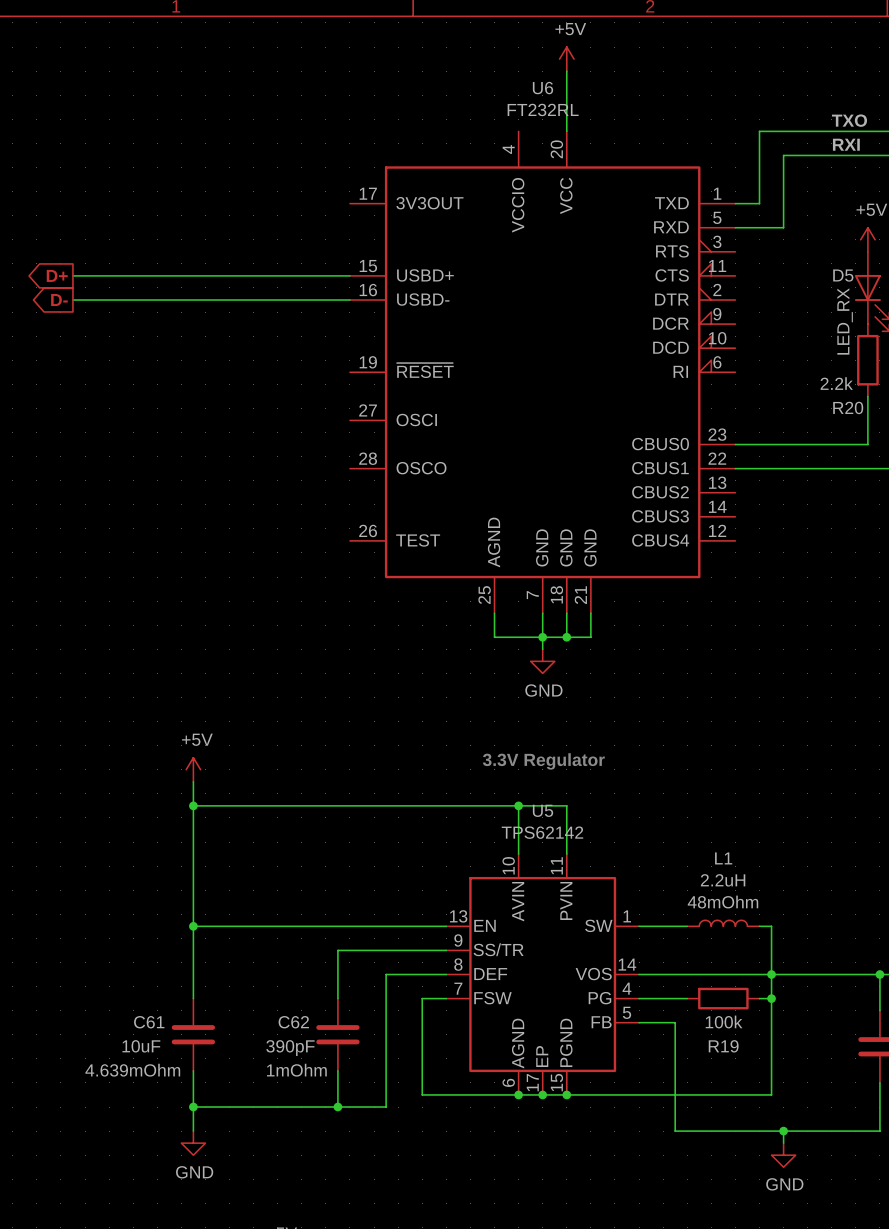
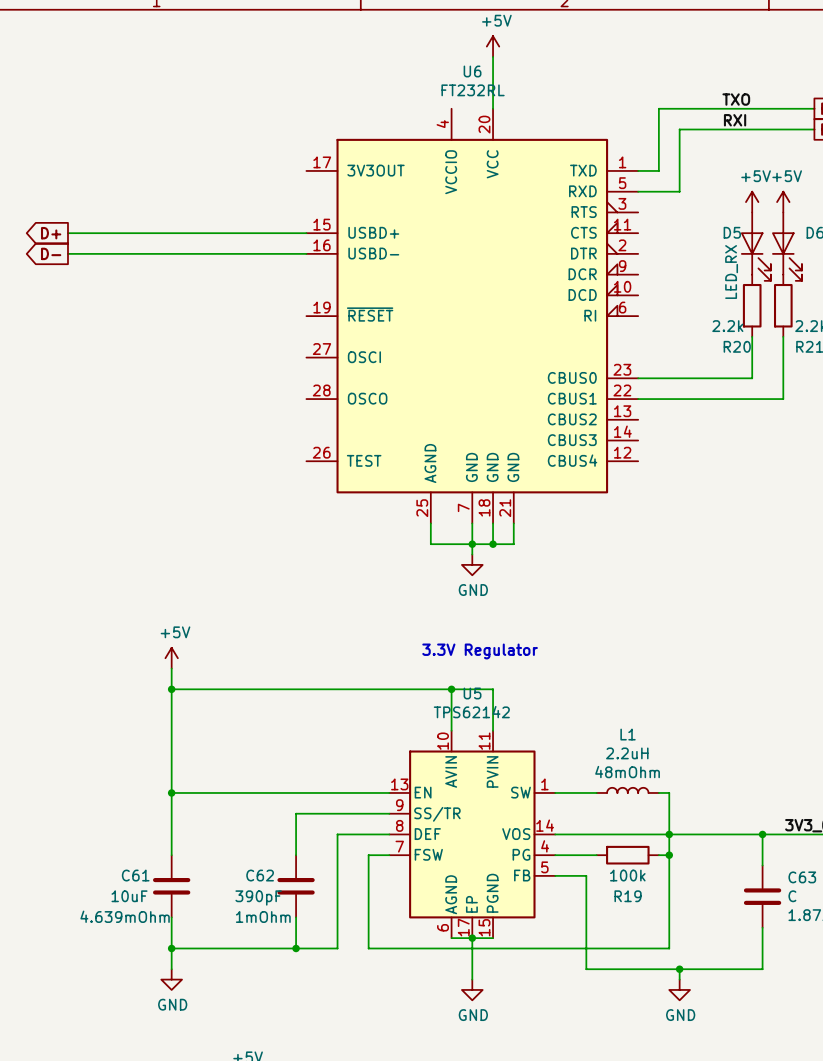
wire: (422, 1094) (518, 1094) -> none
junction: (518, 1094) -> none
wire: none -> (472, 938) (472, 979)
wire: (566, 1094) (771, 1094) -> (368, 938) (368, 948) (669, 948) (669, 938)
junction: (566, 1094) -> none
power symbol: none -> GND (472, 989)

